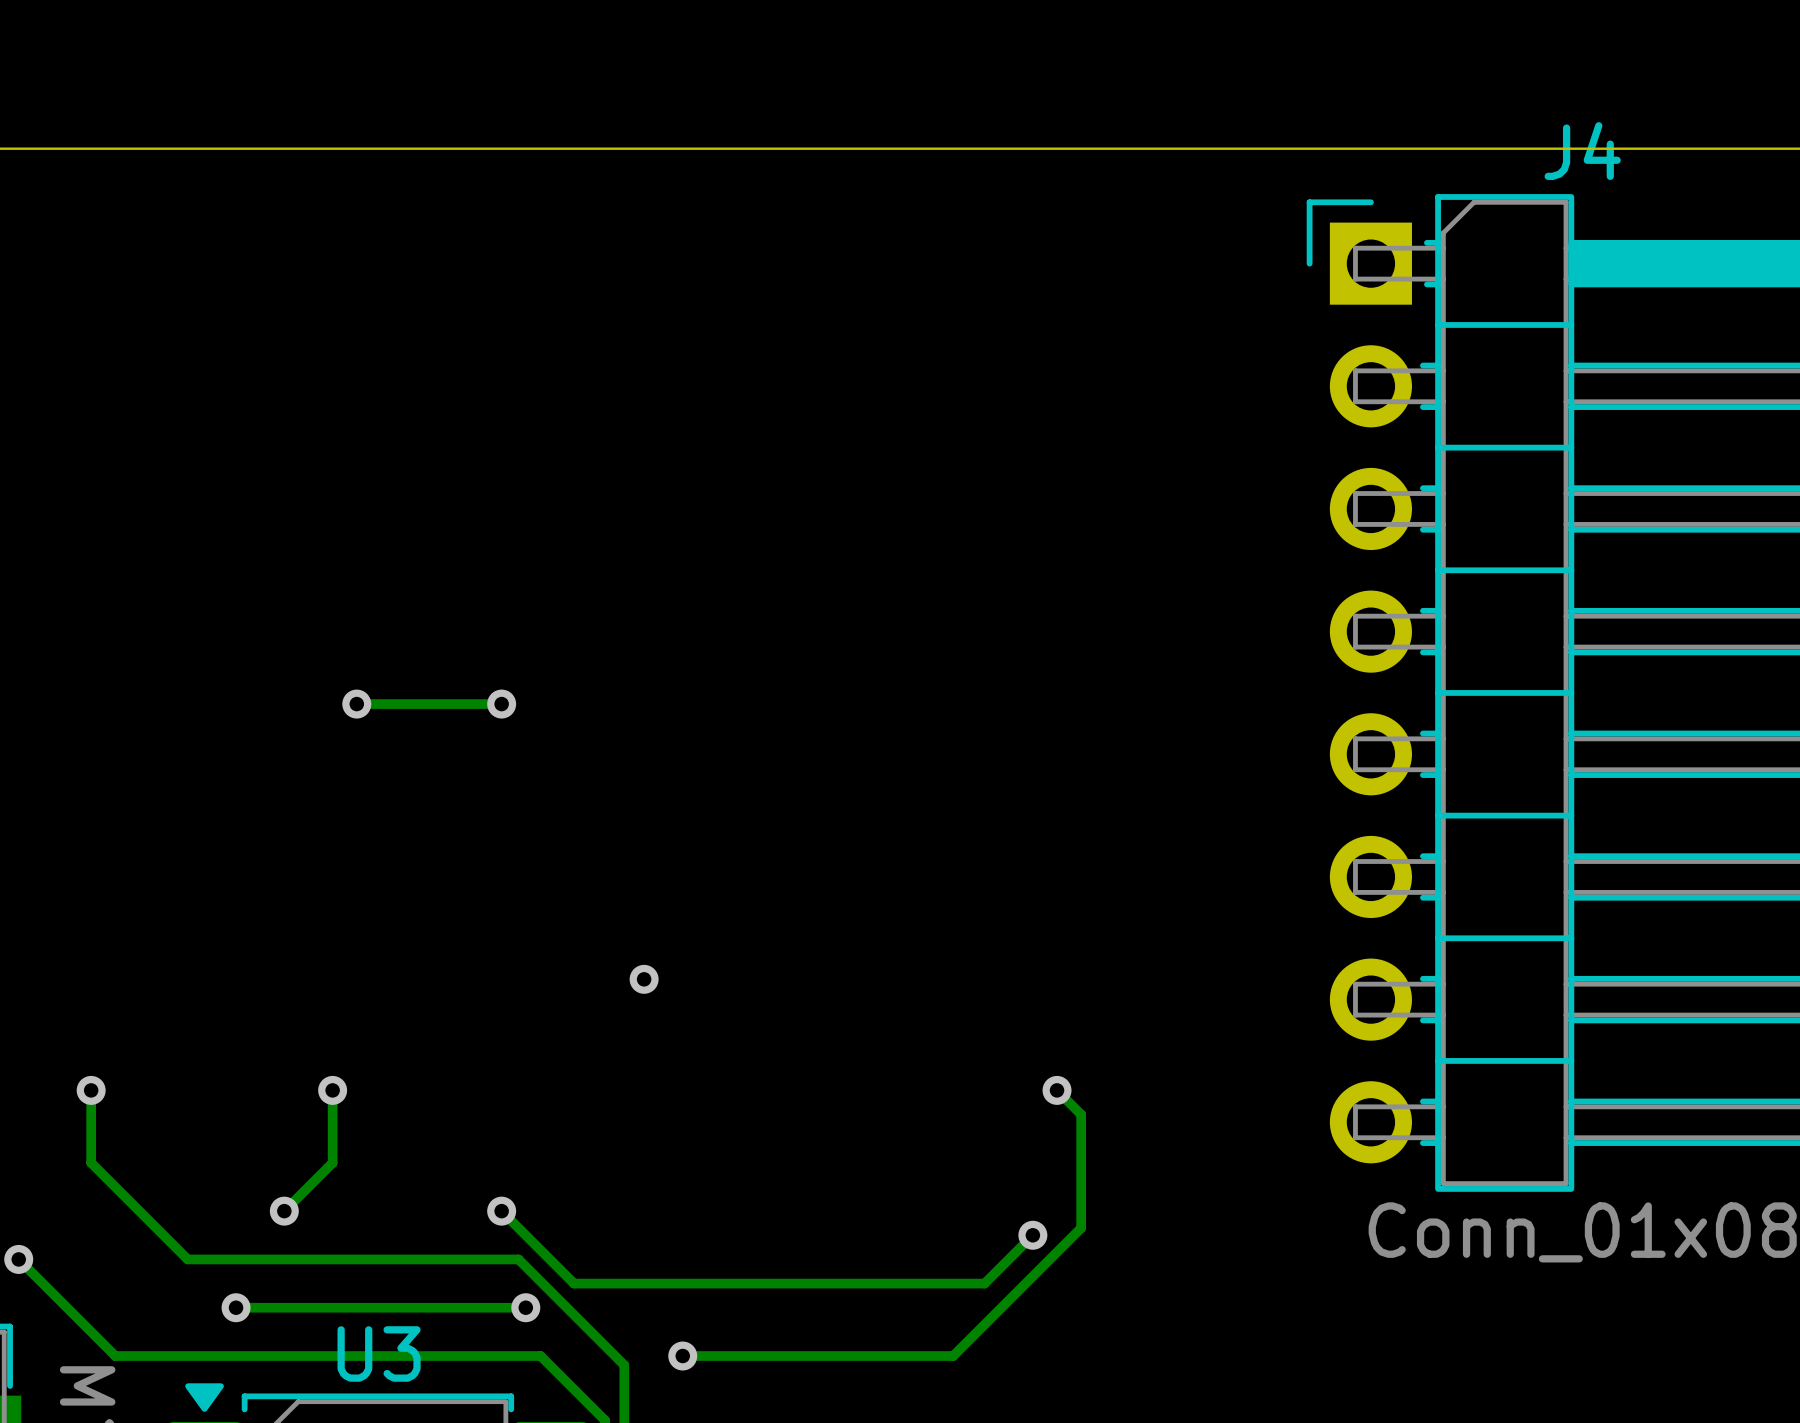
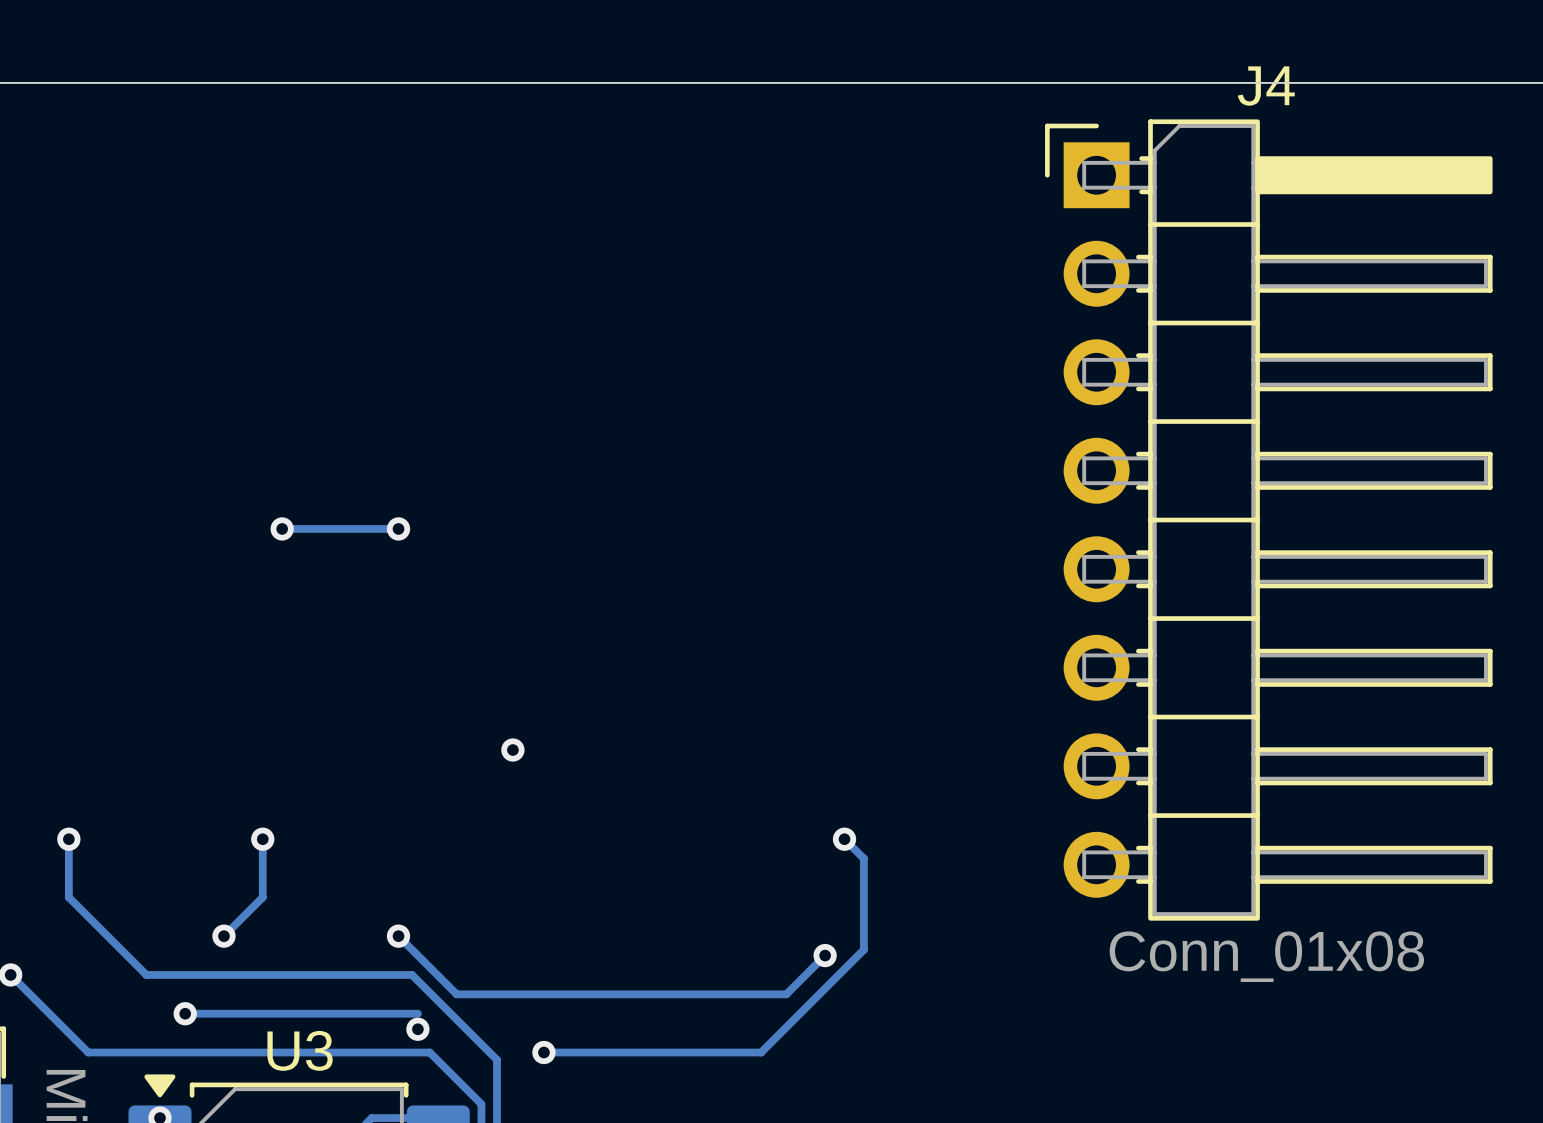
via position: (525, 1307) -> (417, 1029)

